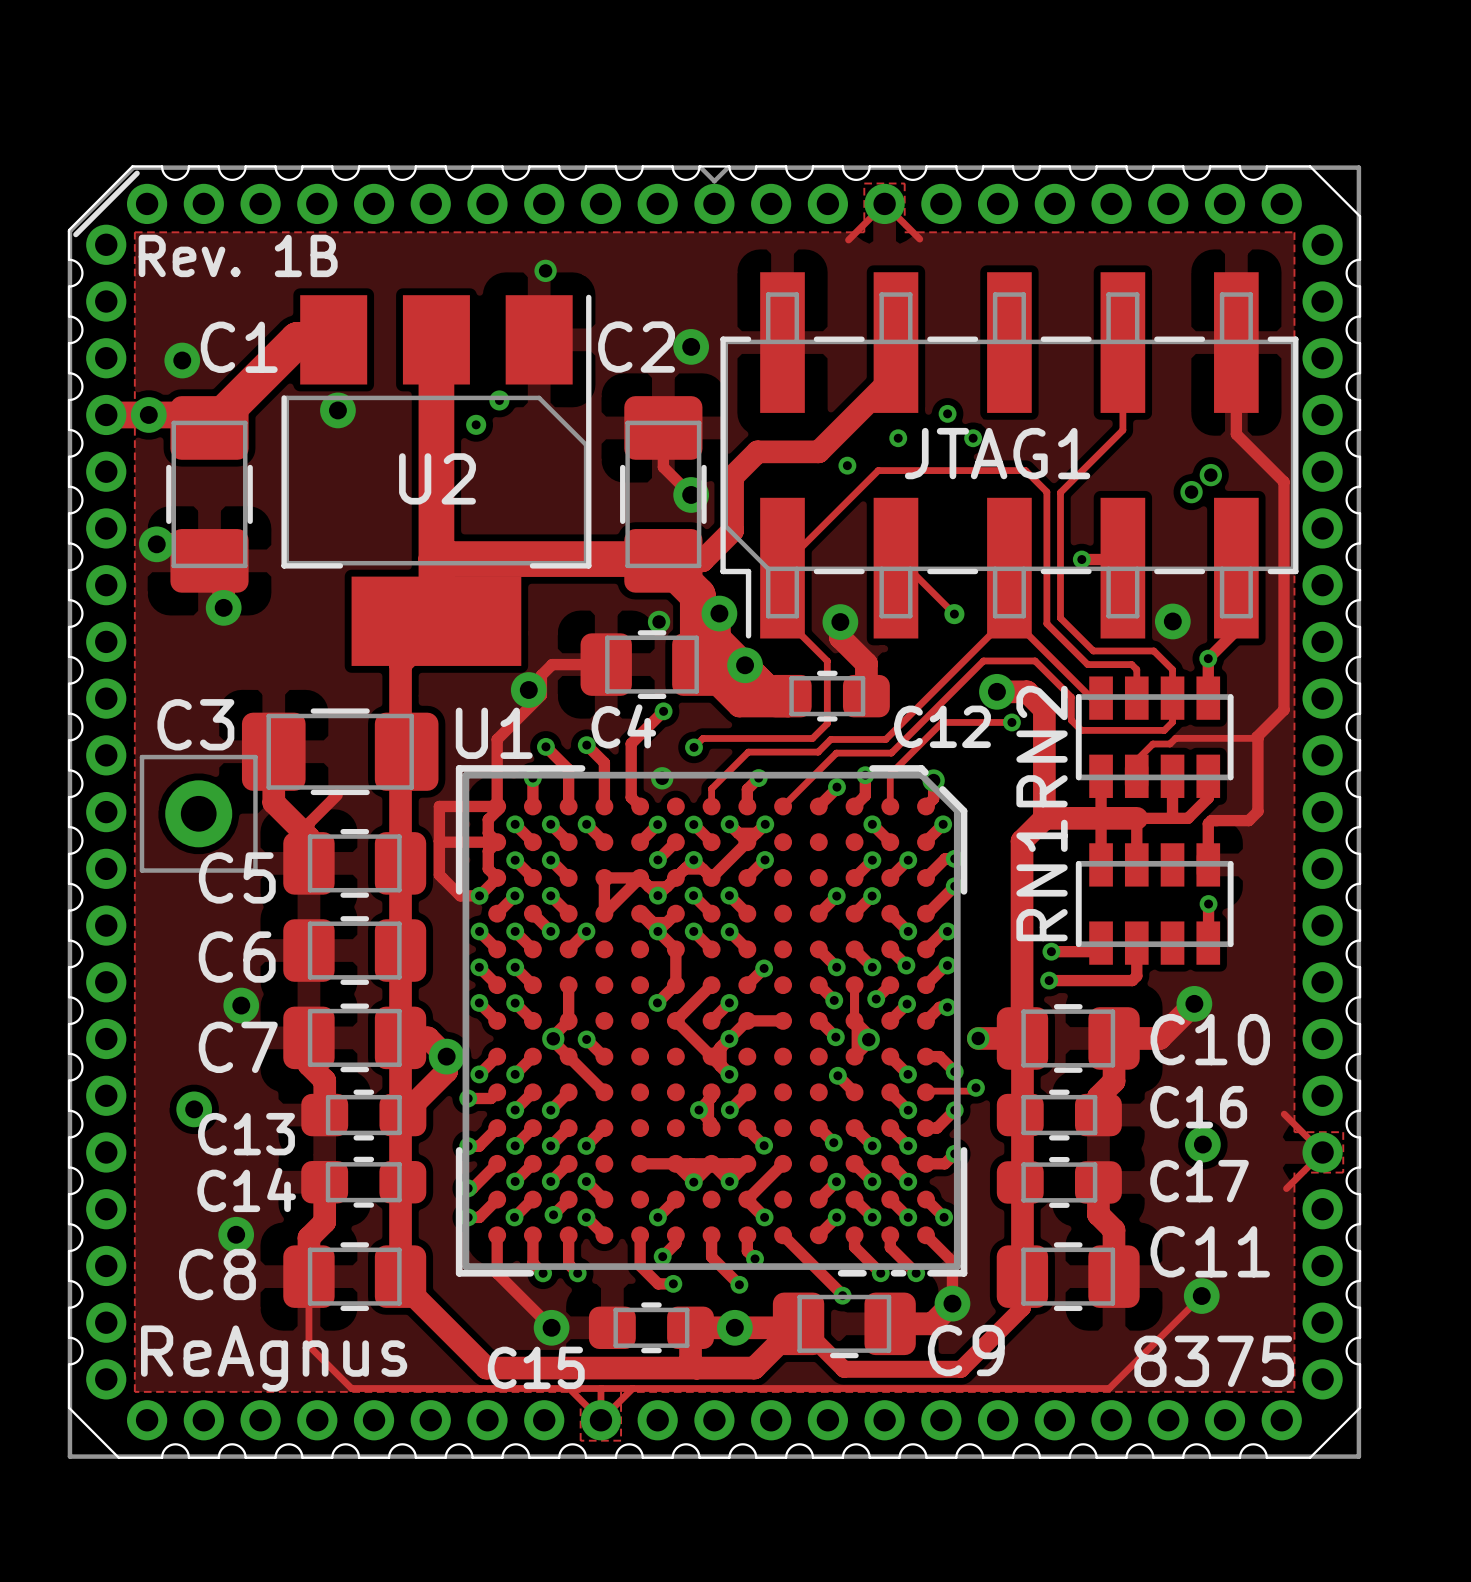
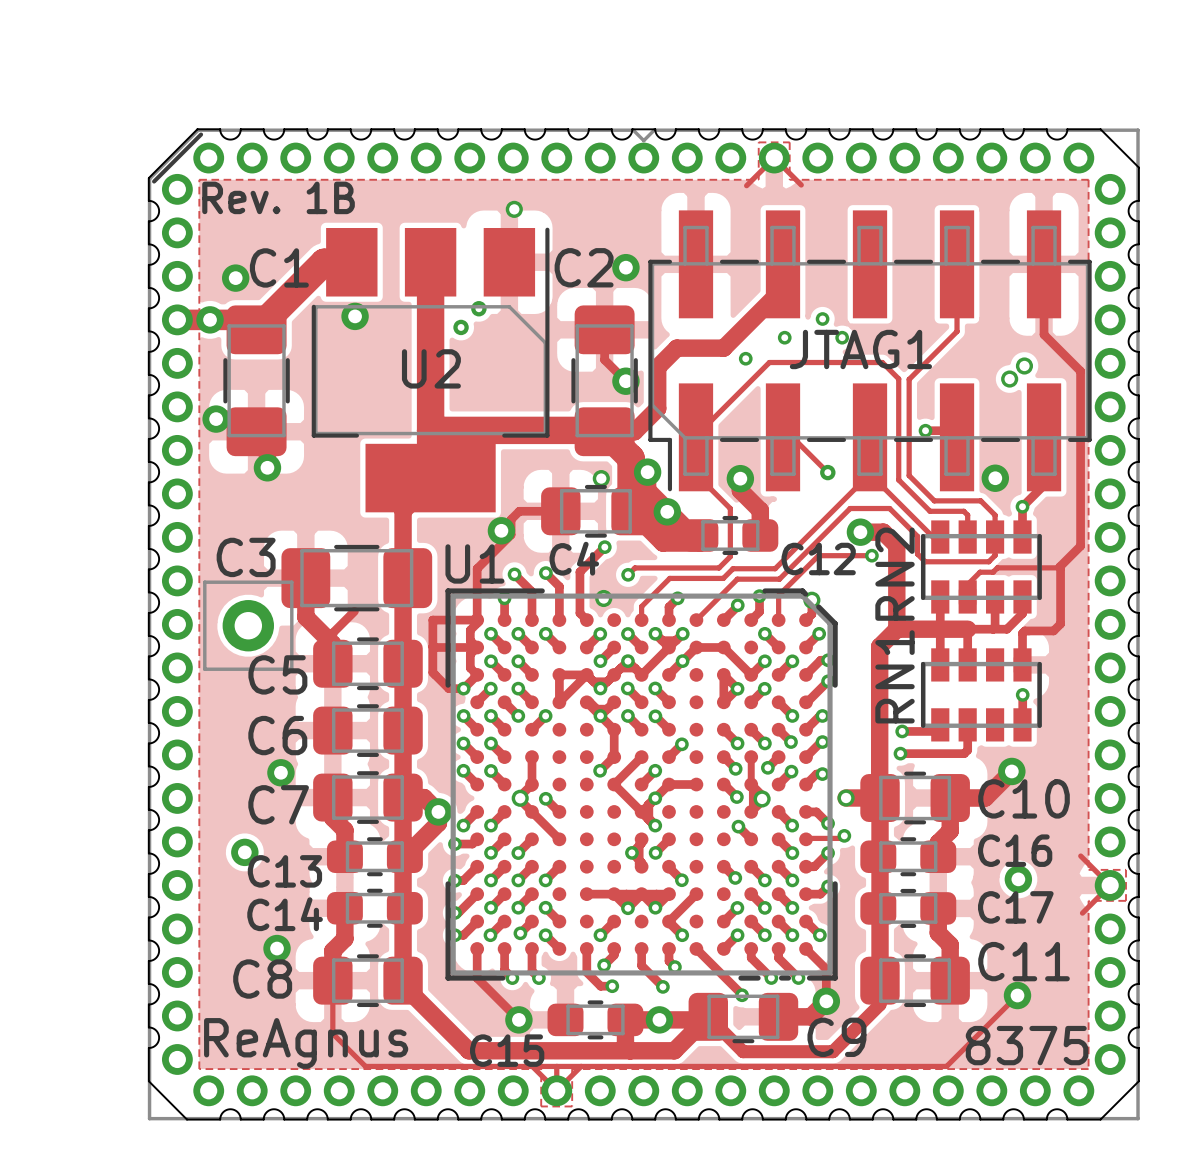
track: none -> (682, 661) (696, 647) (723, 647) (751, 674)
track: none -> (737, 688) (723, 675) (723, 702)

